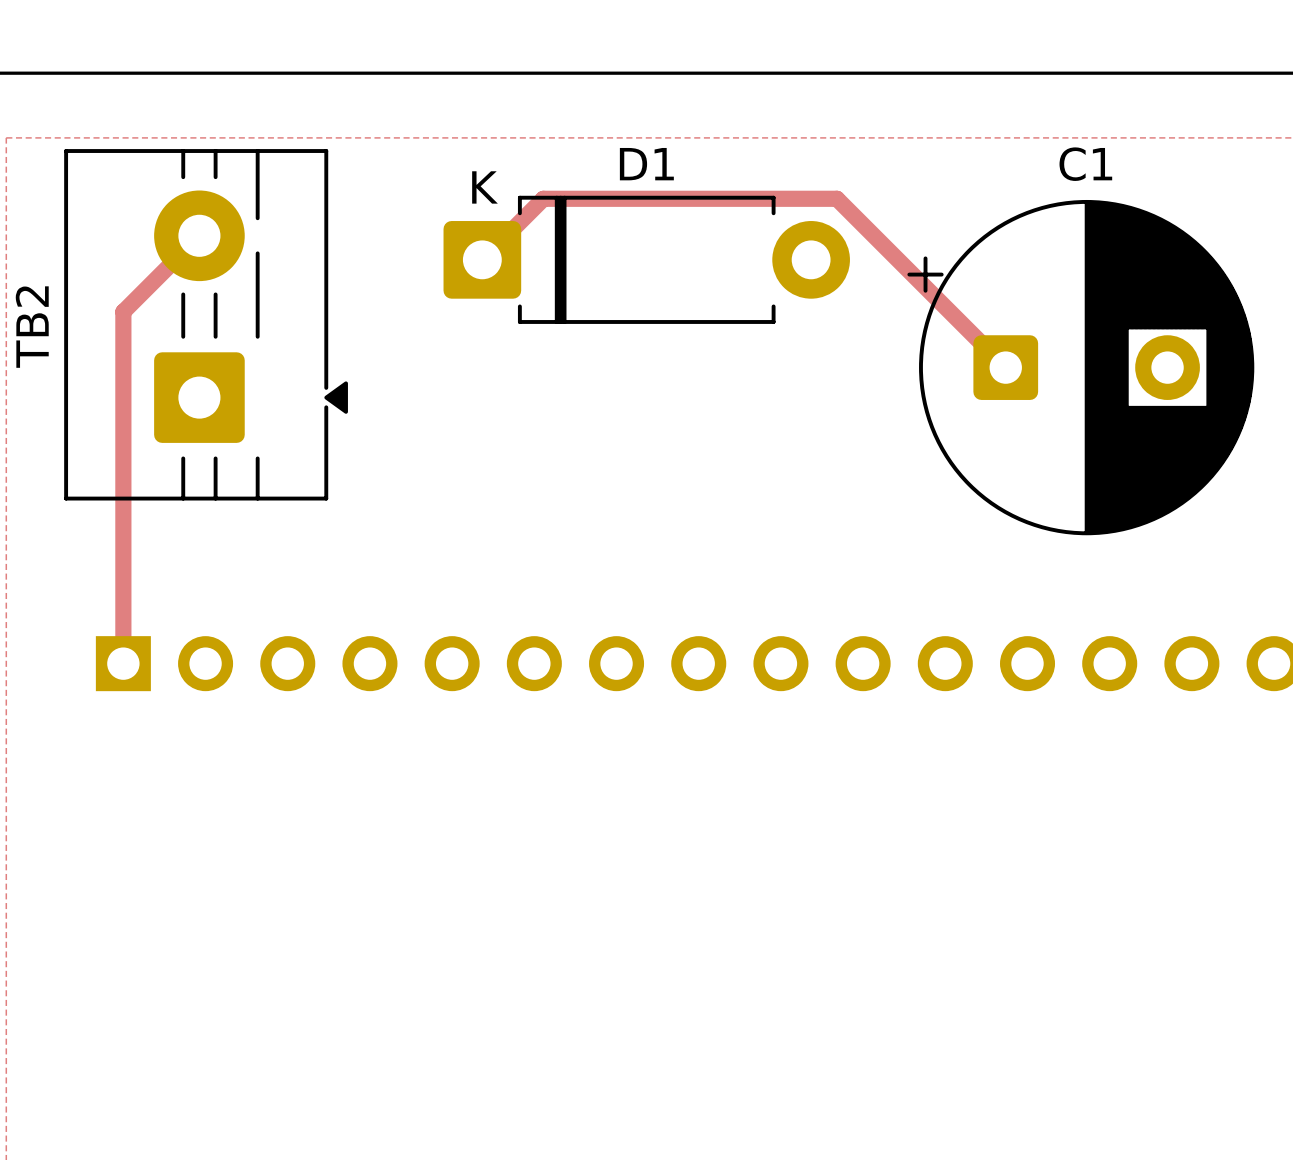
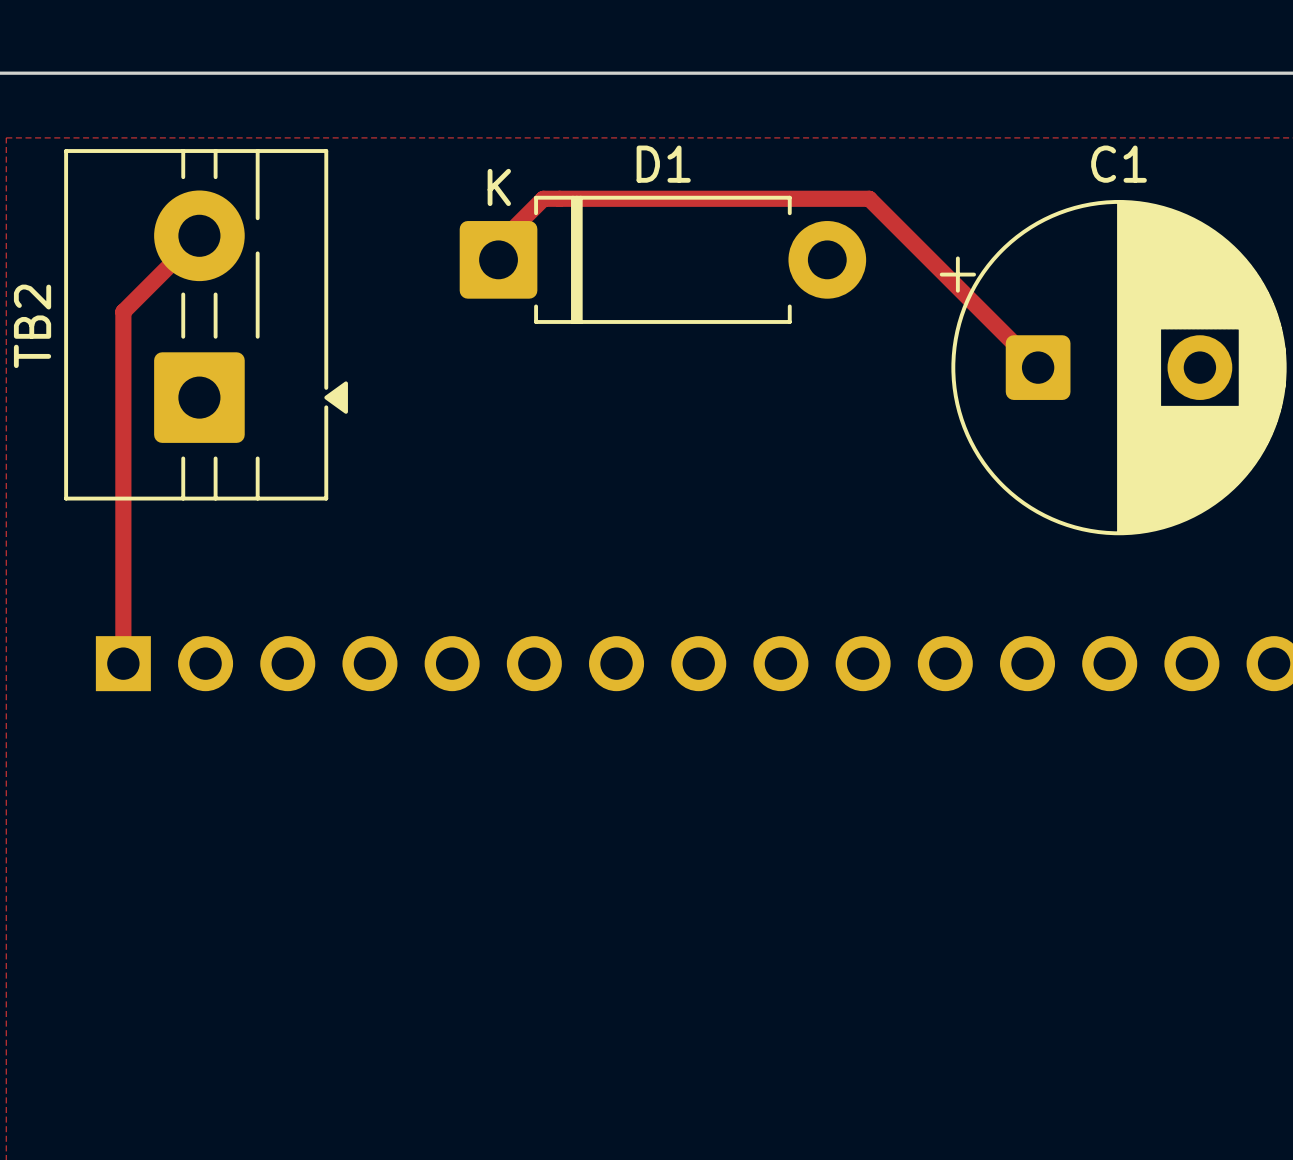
track: (836, 198) (1005, 367) -> (836, 198) (869, 198) (1038, 367)
D1 position: (646, 259) -> (662, 259)
C1 position: (1080, 367) -> (1113, 367)

